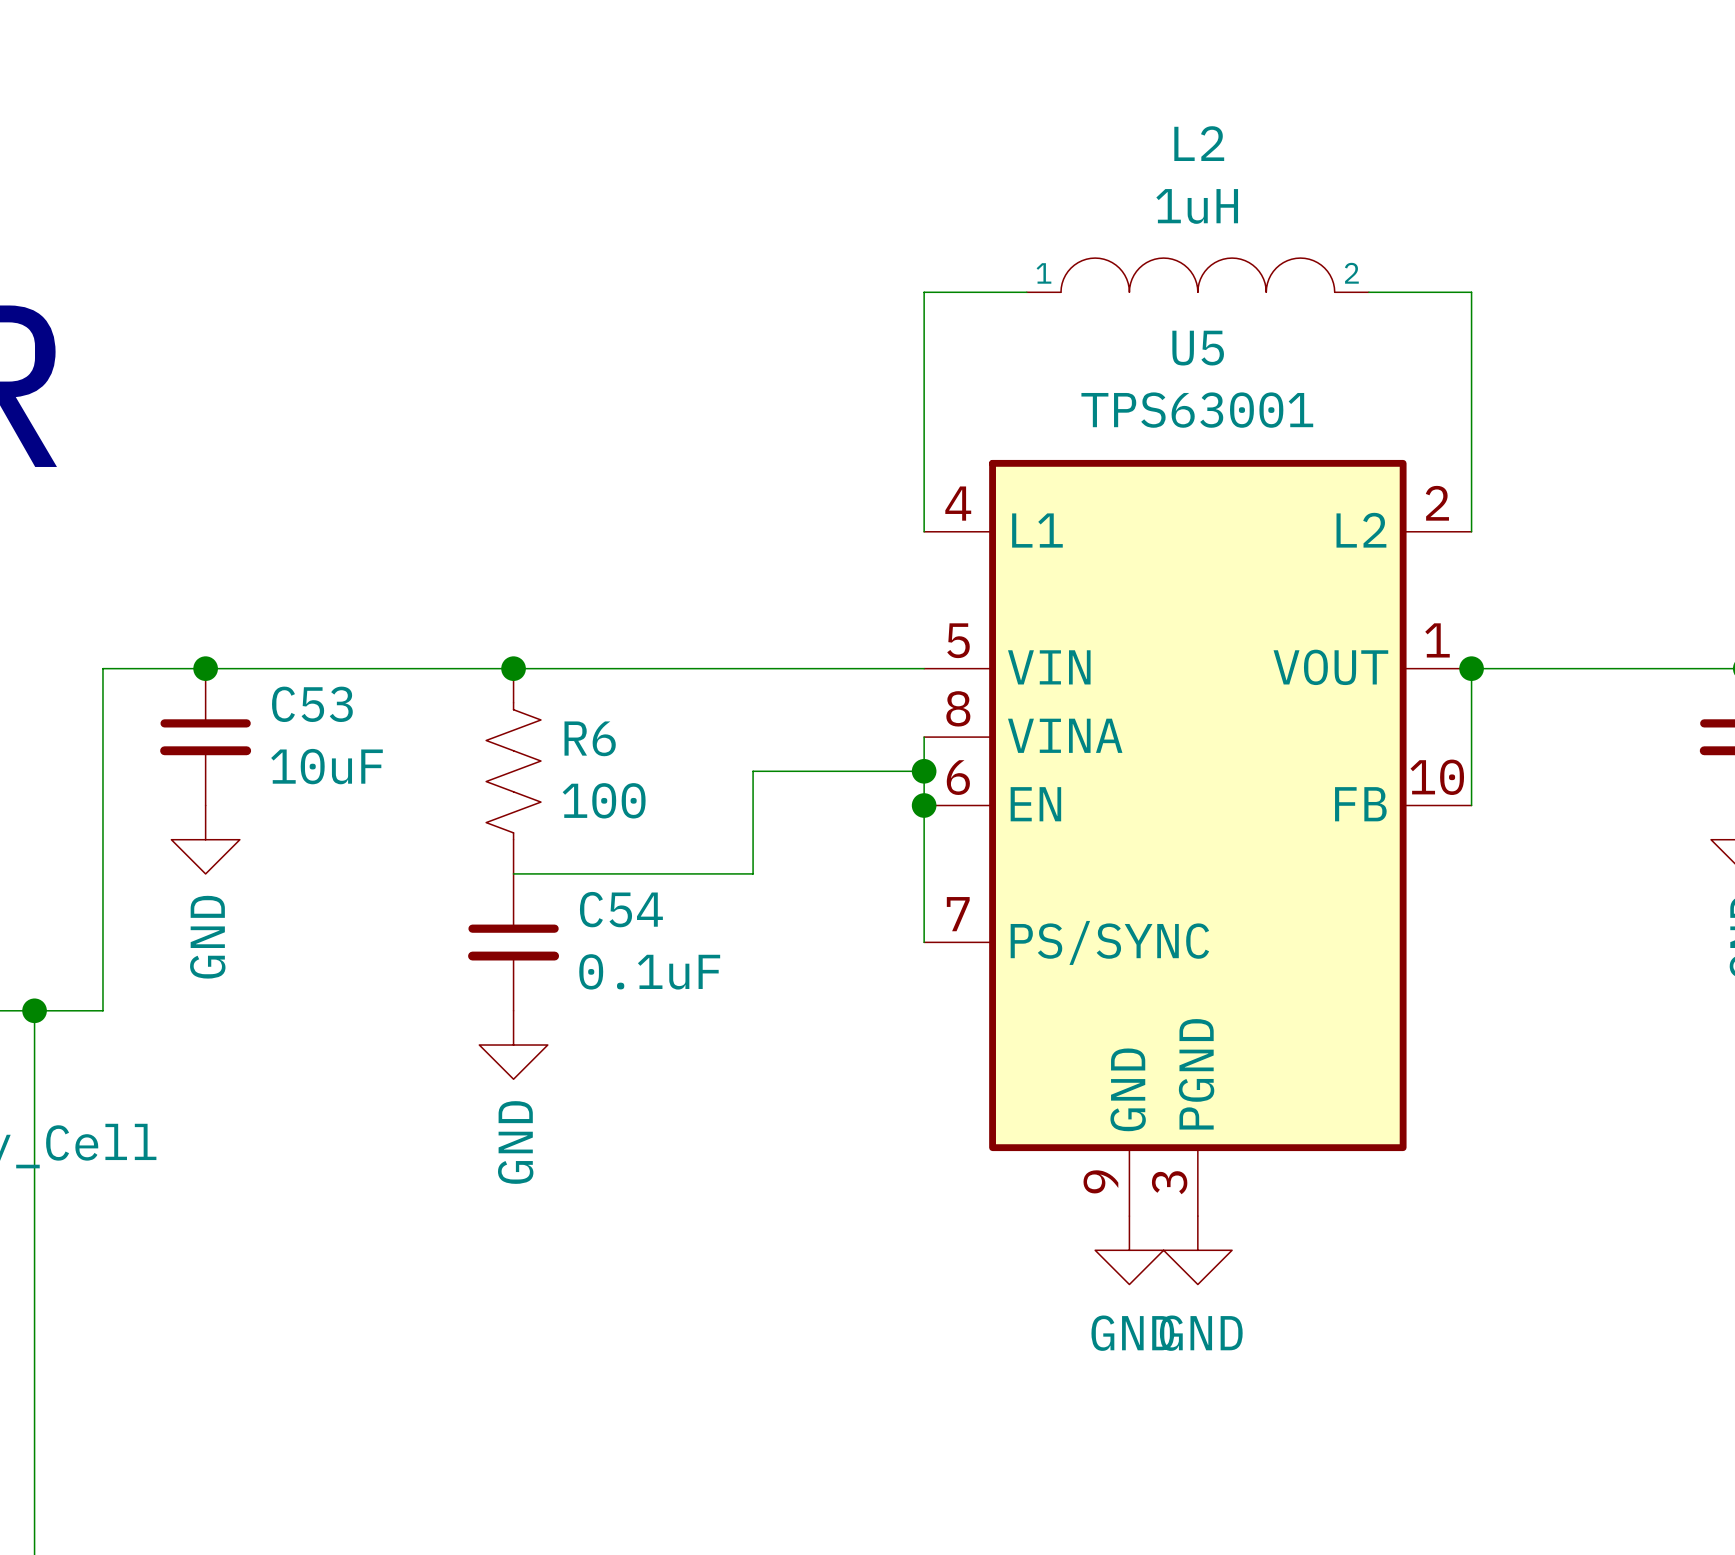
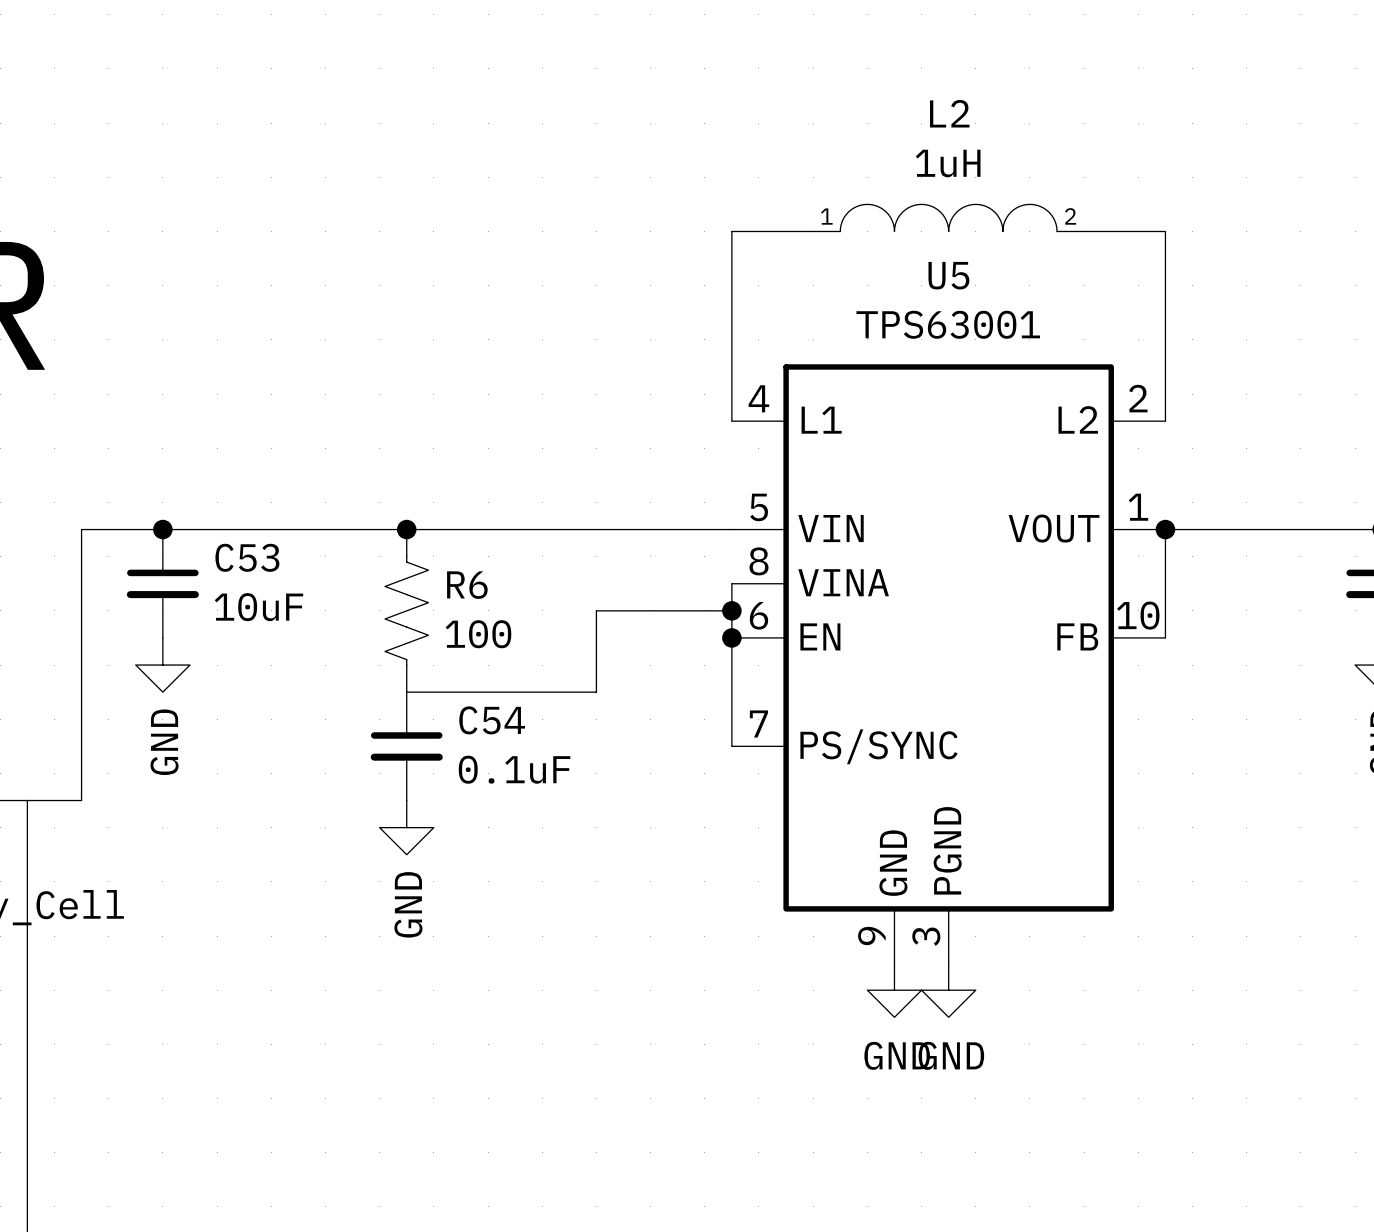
junction: (34, 1010) -> none

